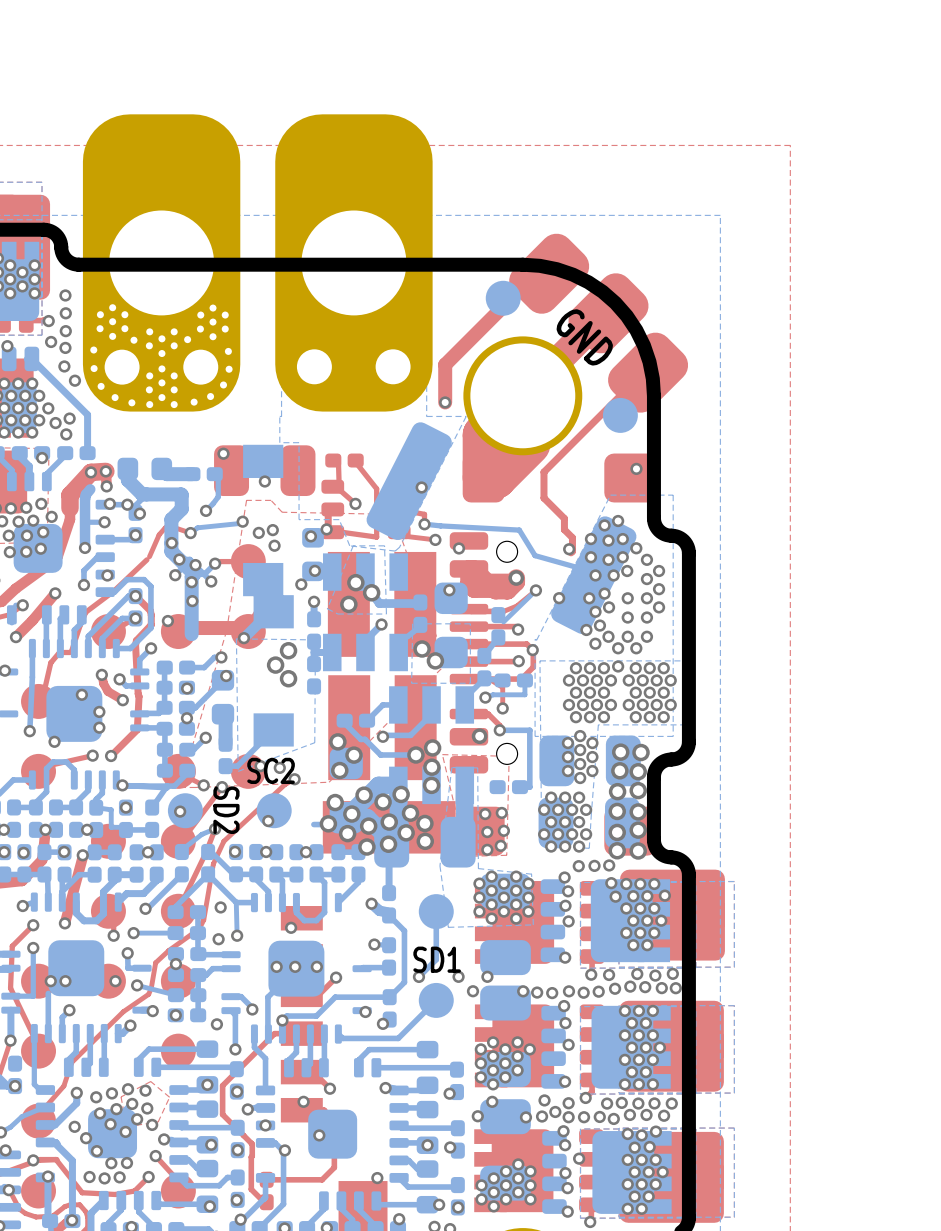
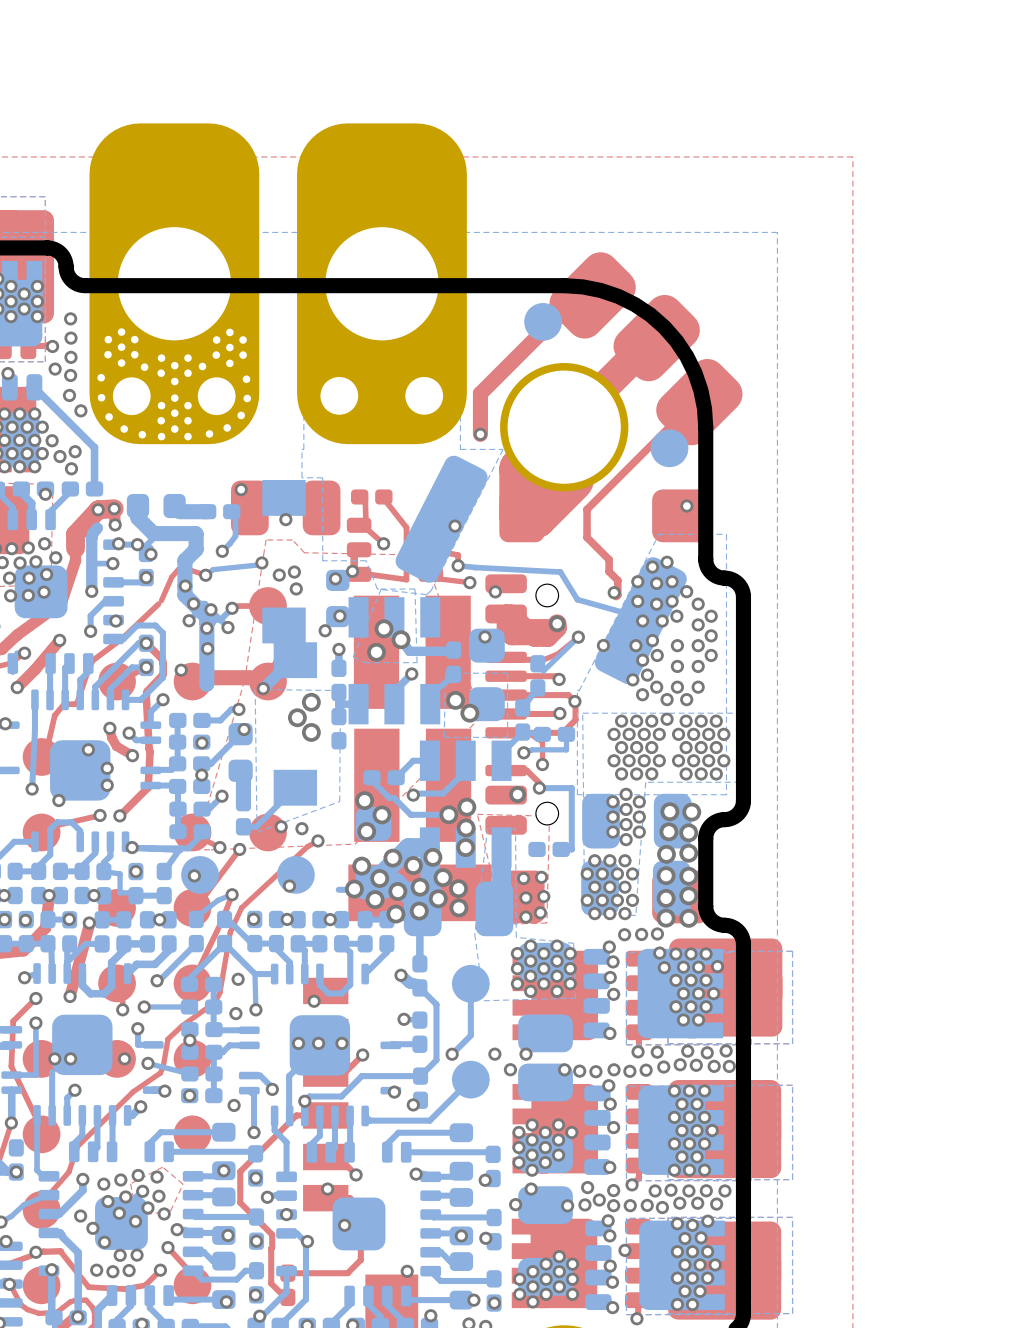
text: GND (584, 337) -> none
text: SC2 (271, 770) -> none
text: SD2 (226, 810) -> none
text: SD1 (437, 959) -> none

